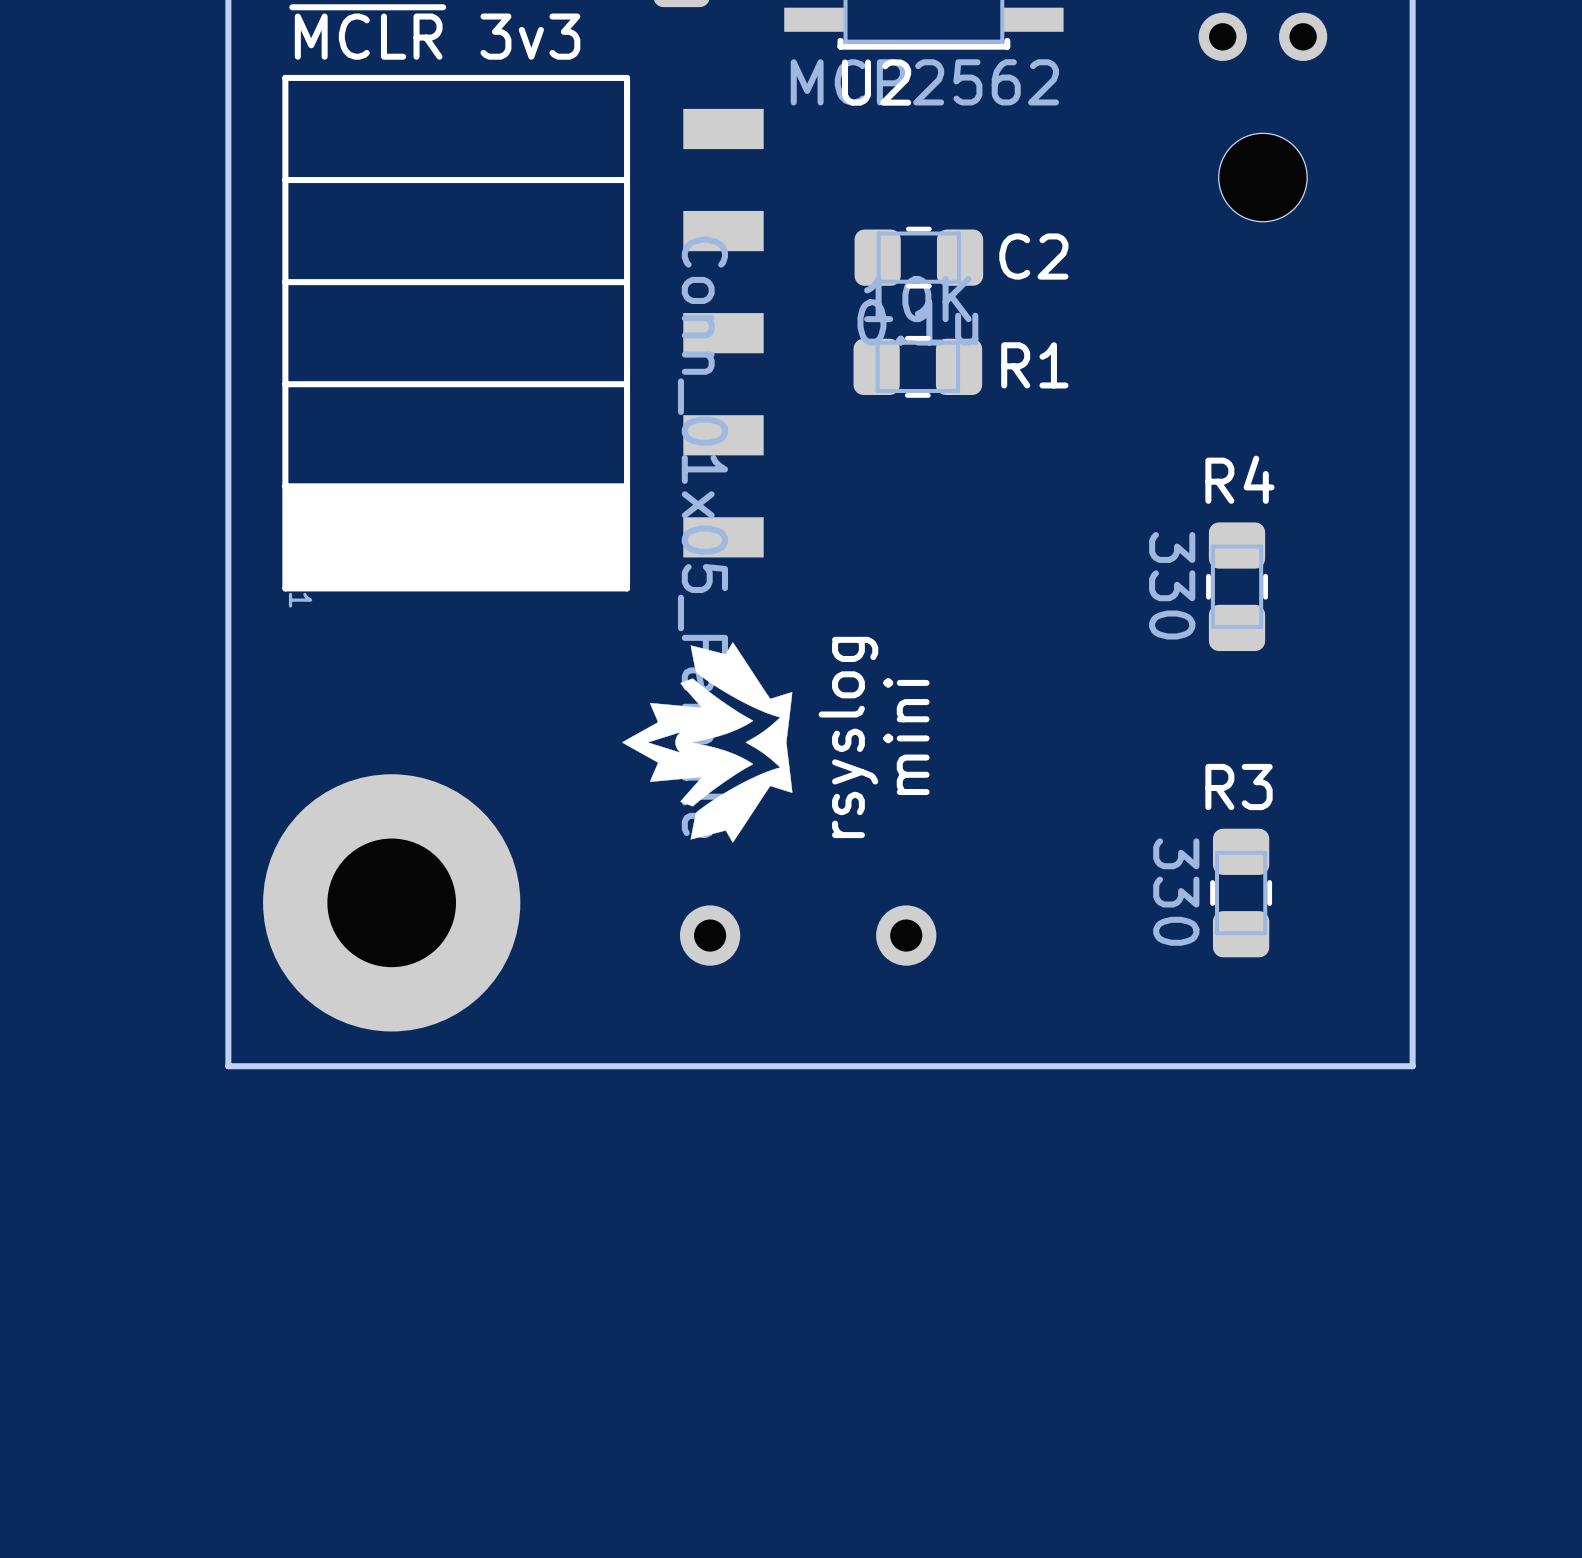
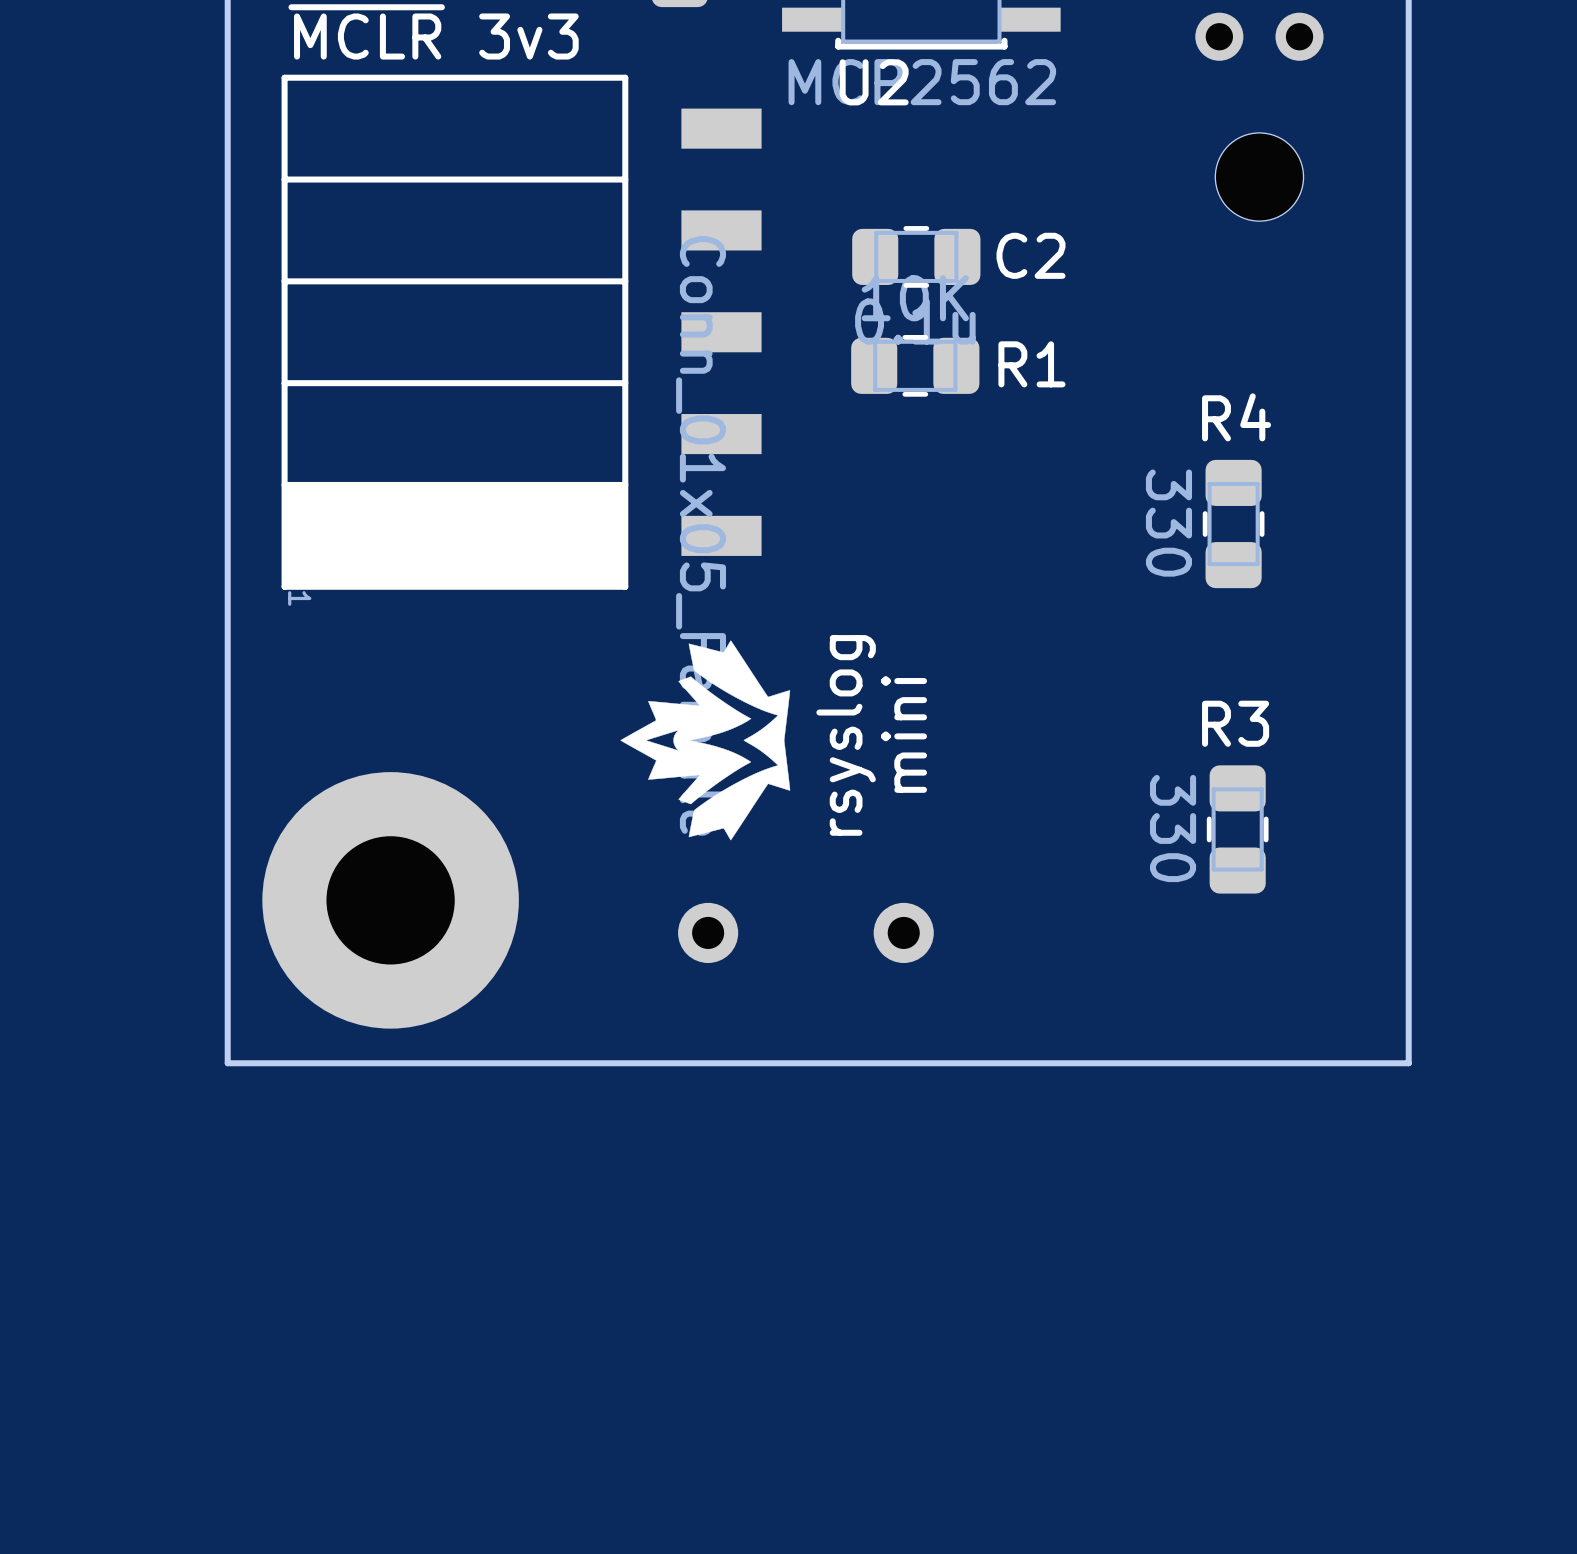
R4 position: (1237, 586) -> (1233, 524)
R3 position: (1241, 893) -> (1237, 829)

